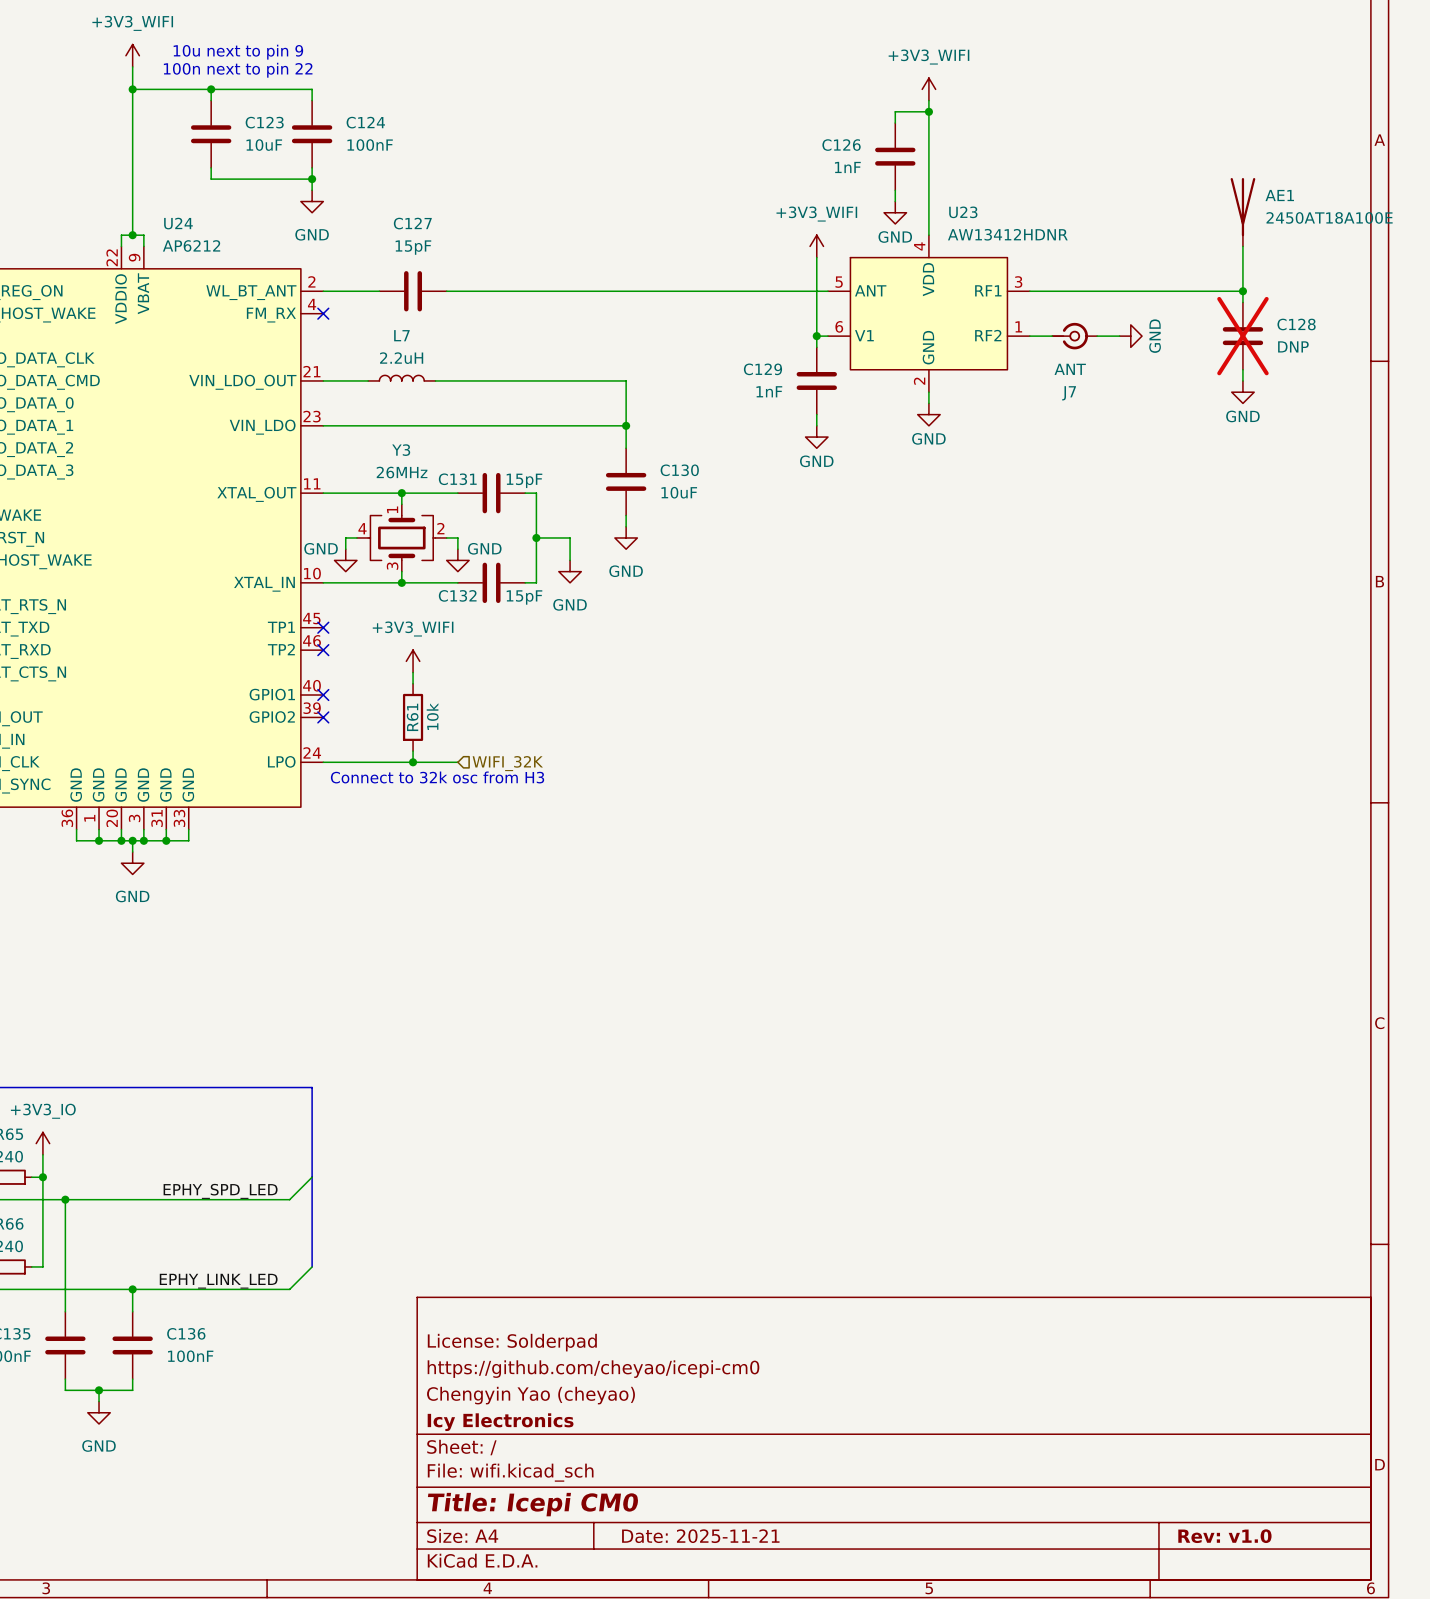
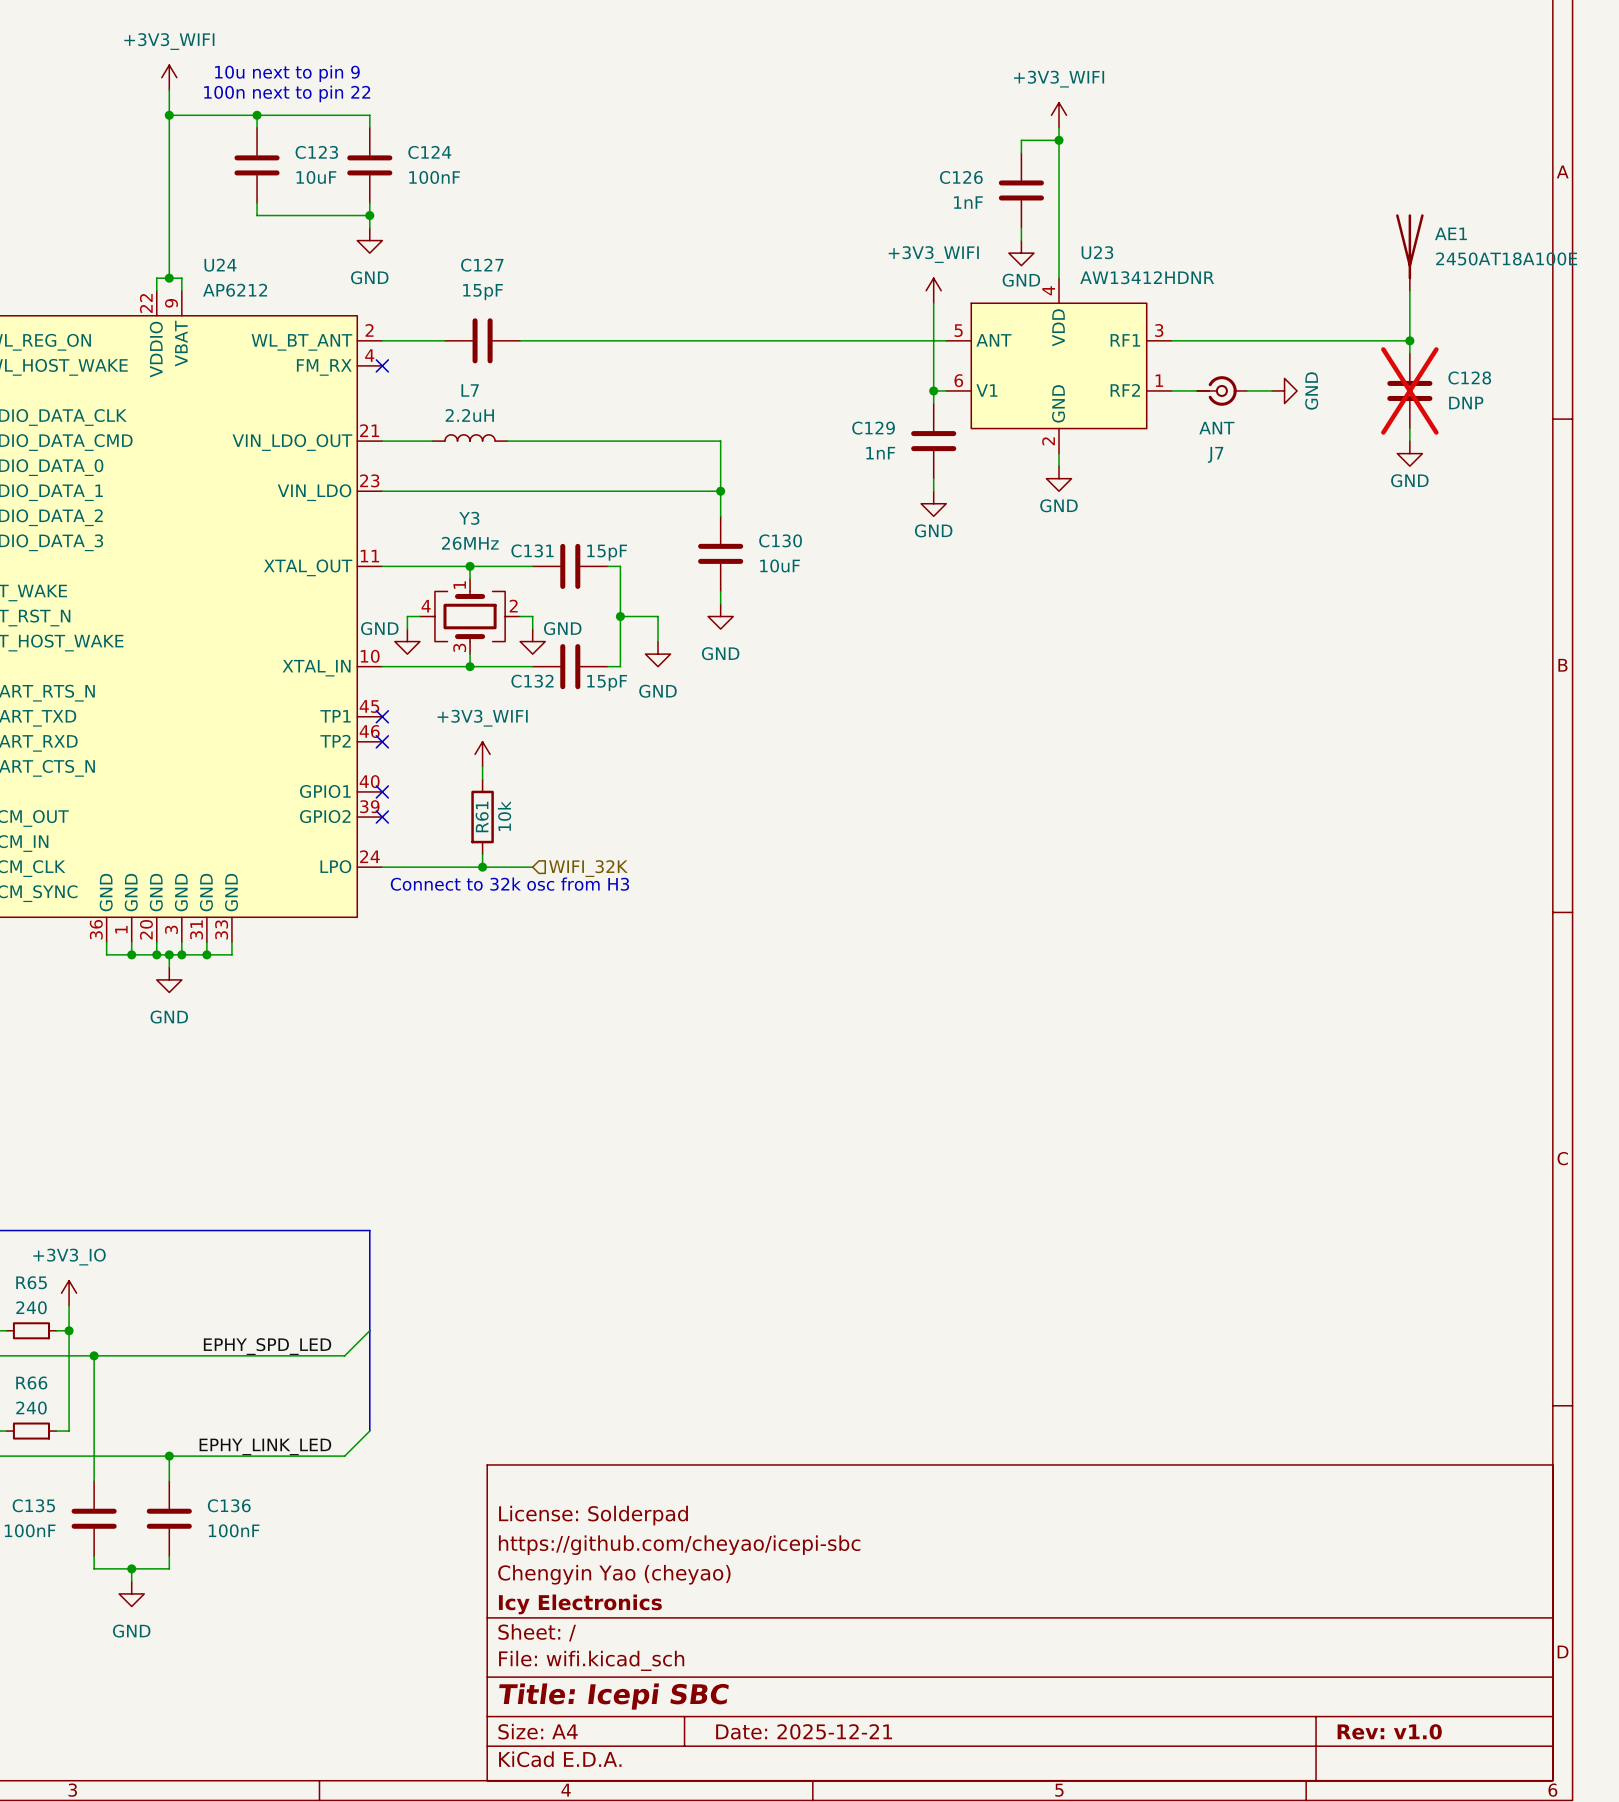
title block: https://github.com/cheyao/icepi-cm0 (593, 1369) -> https://github.com/cheyao/icepi-sbc (679, 1545)
title block: Title: Icepi CM0 (533, 1504) -> Title: Icepi SBC (613, 1696)
title block: Date: 2025-11-21 (700, 1536) -> Date: 2025-12-21 (804, 1731)

